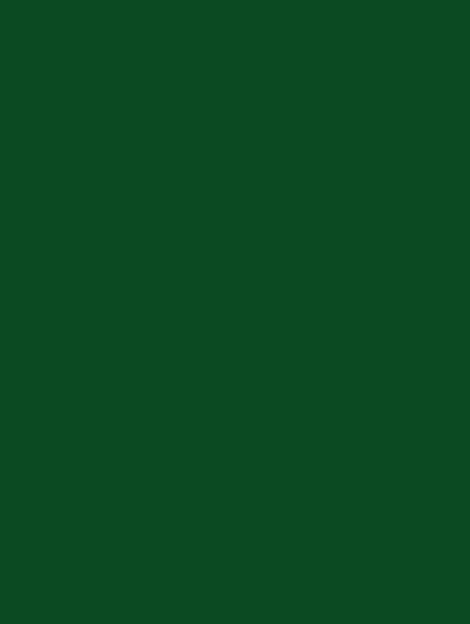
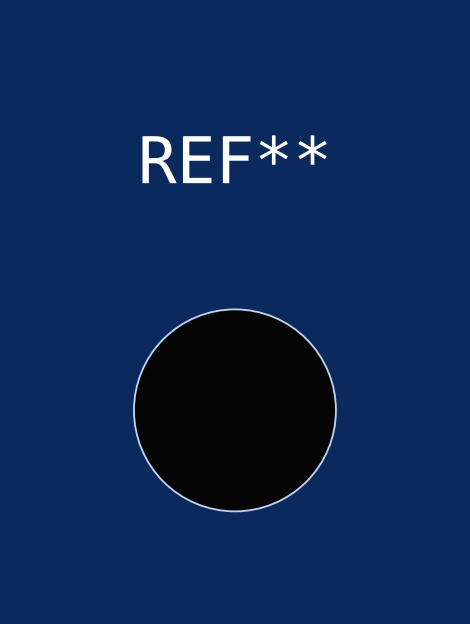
REF**: none -> (234, 410)

